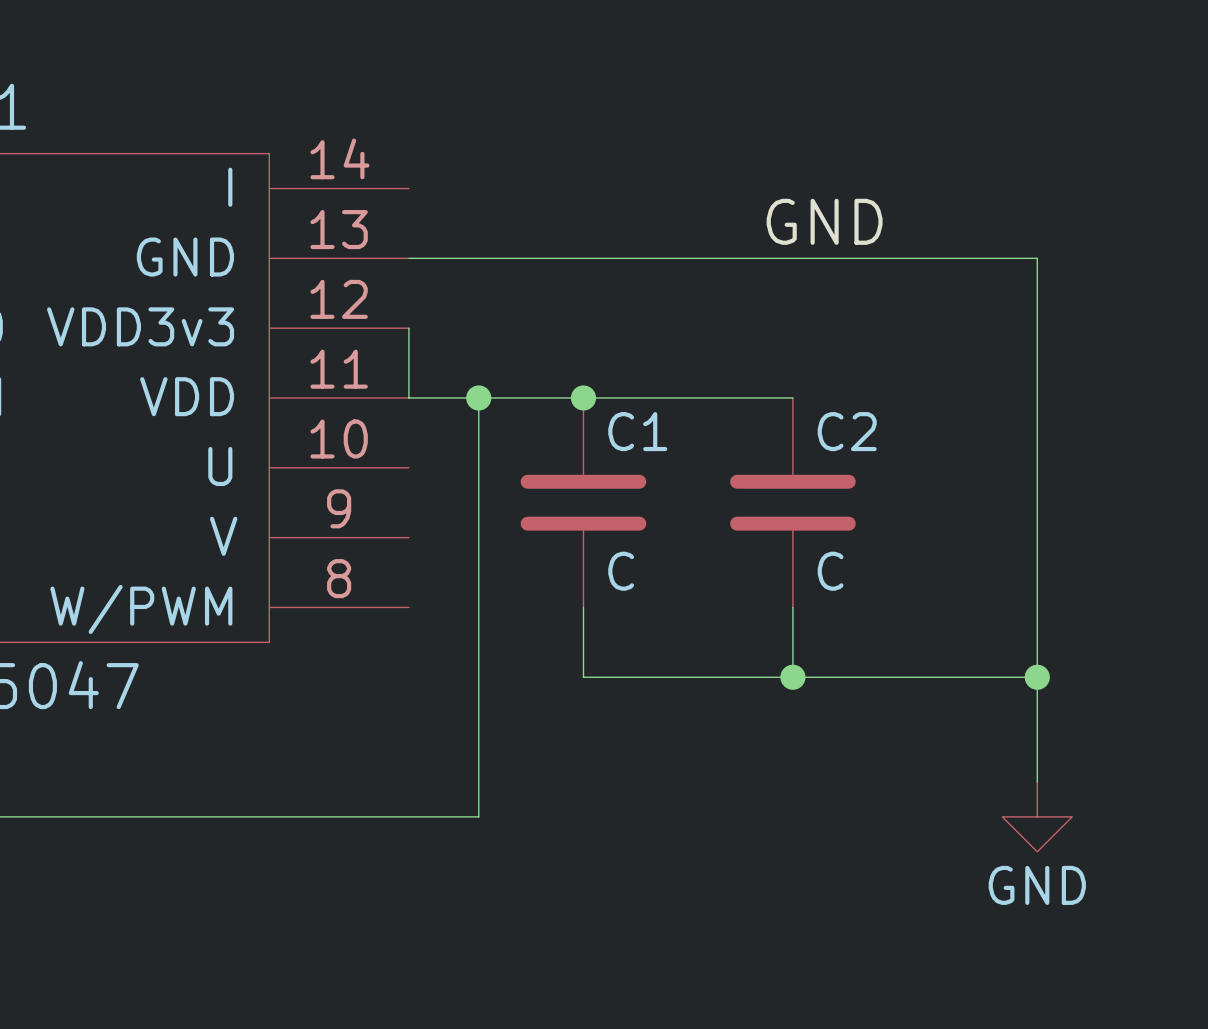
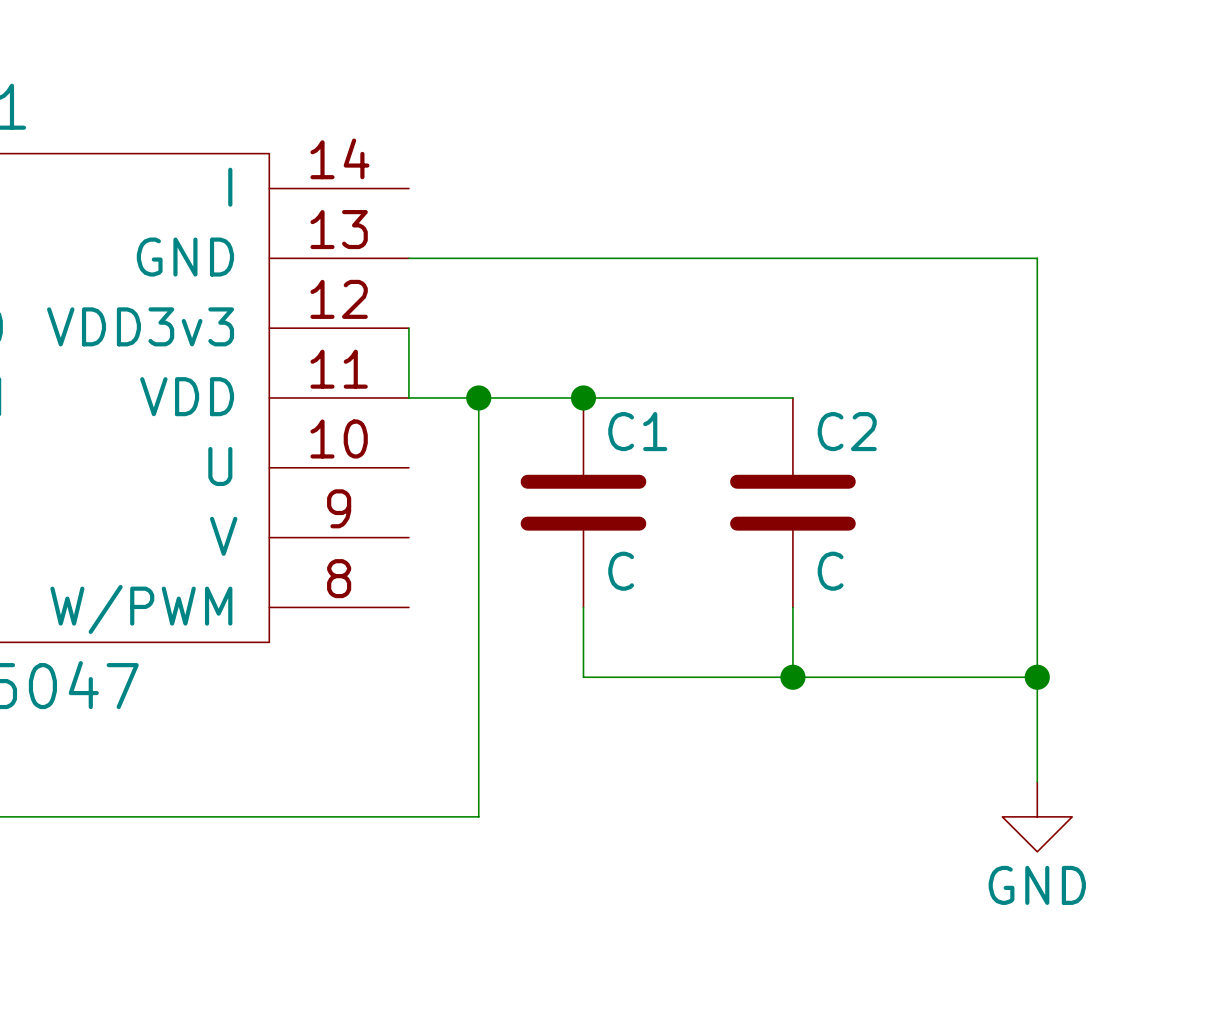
label: GND (824, 221) -> none

